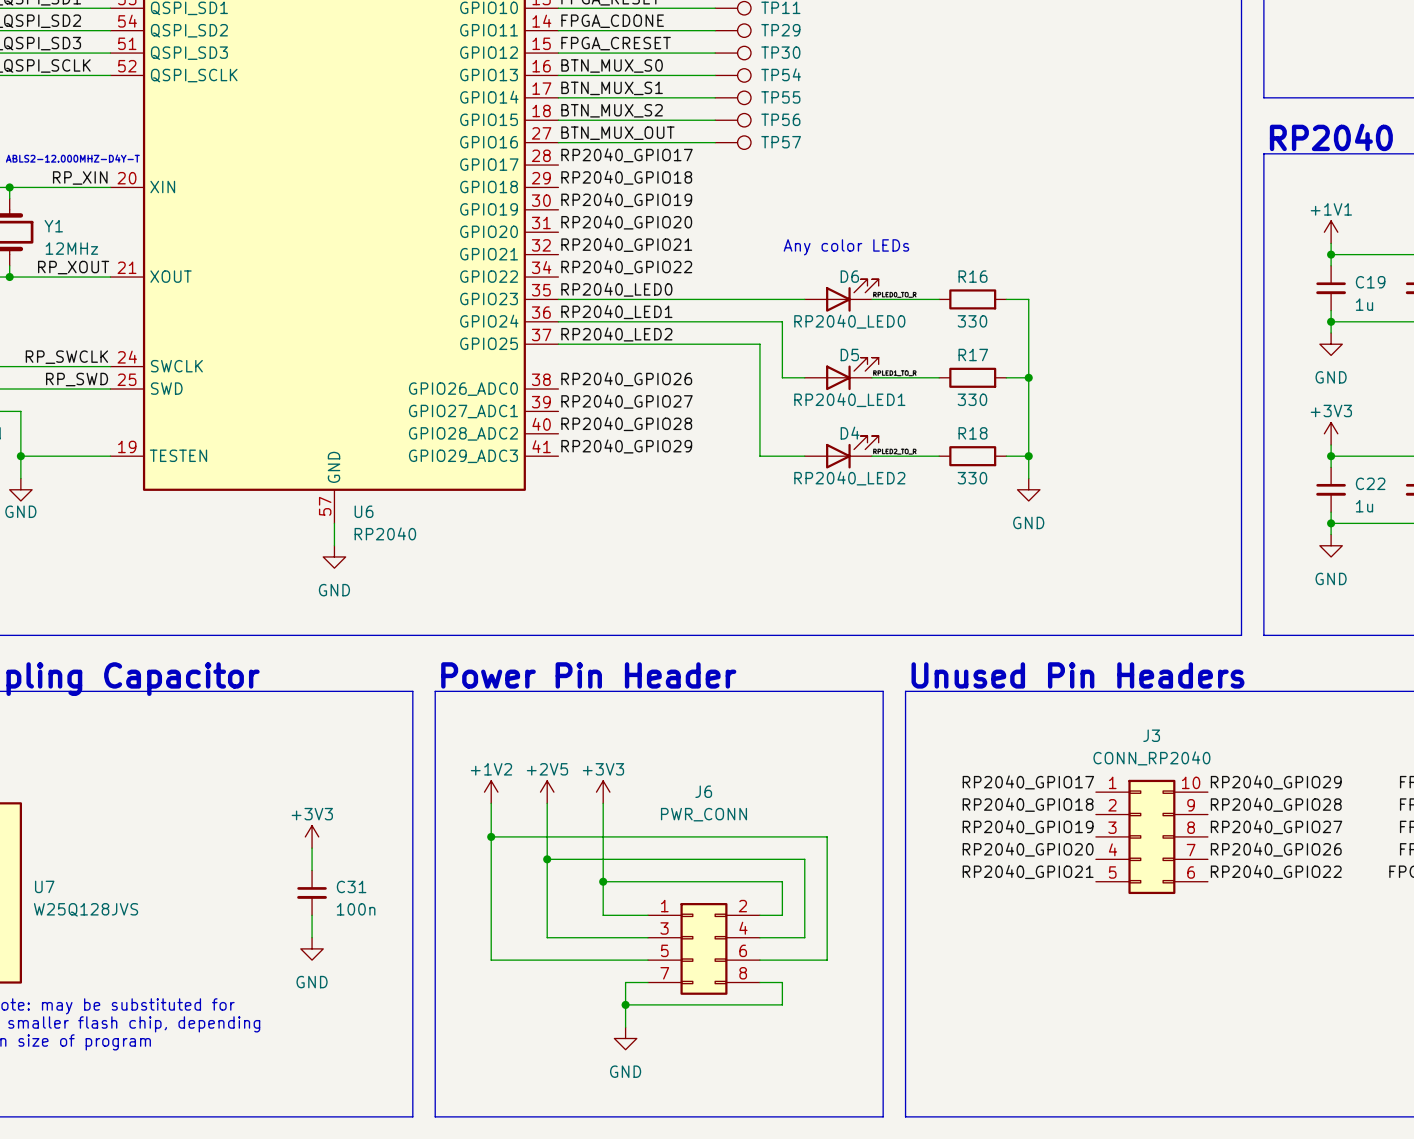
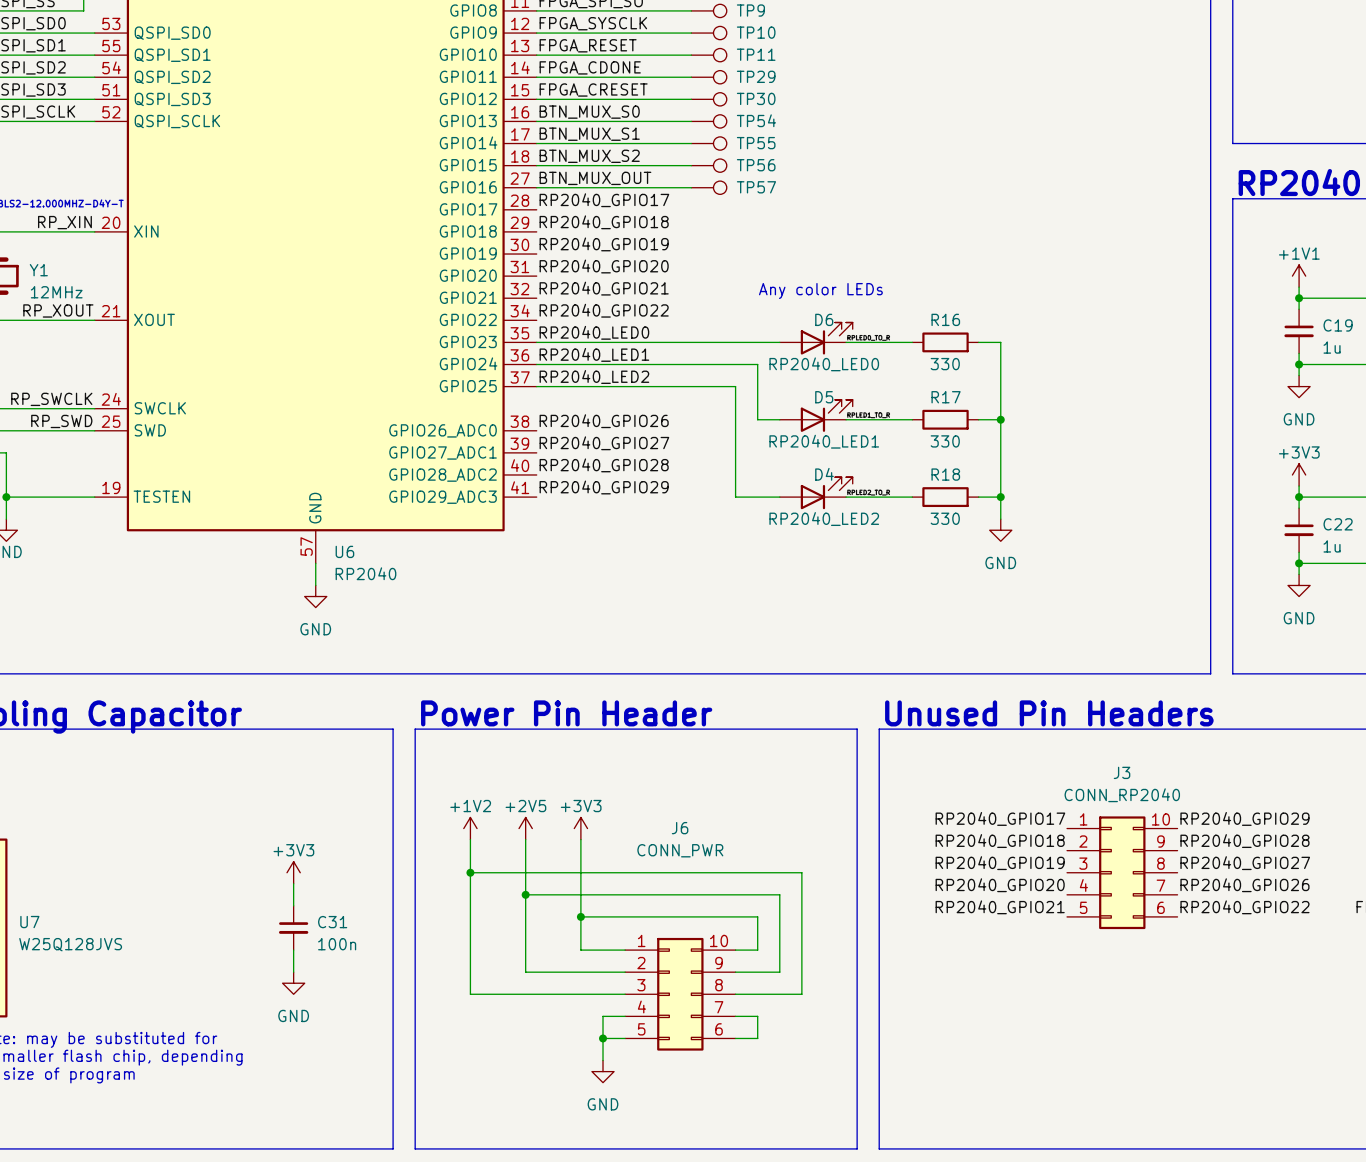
J6 value: PWR_CONN (703, 814) -> CONN_PWR (680, 850)
J6 symbol: [647, 903, 760, 995] -> [625, 937, 736, 1051]

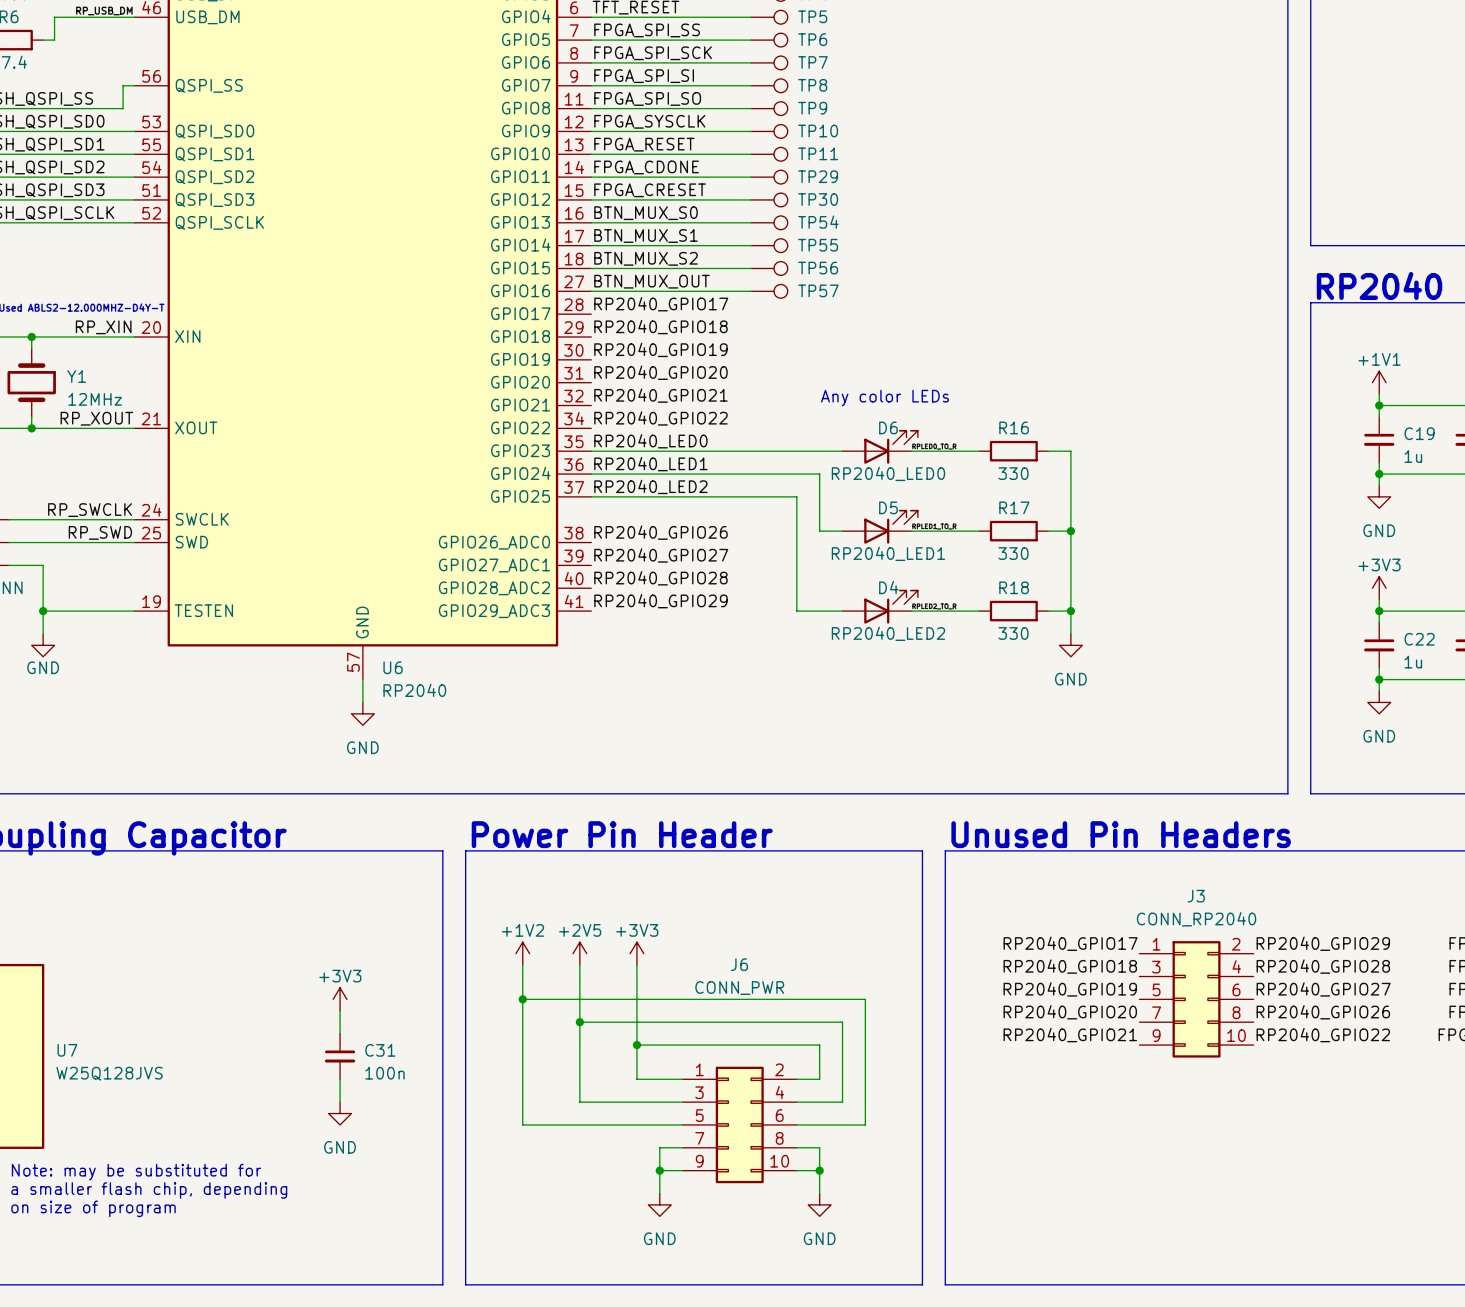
J3 symbol: [1067, 816, 1178, 930] -> [1139, 941, 1254, 1058]
J6 symbol: [625, 937, 736, 1051] -> [682, 1066, 797, 1184]
wire: none -> (819, 1170) (819, 1193)
junction: none -> (819, 1170)
power symbol: none -> GND (819, 1204)

